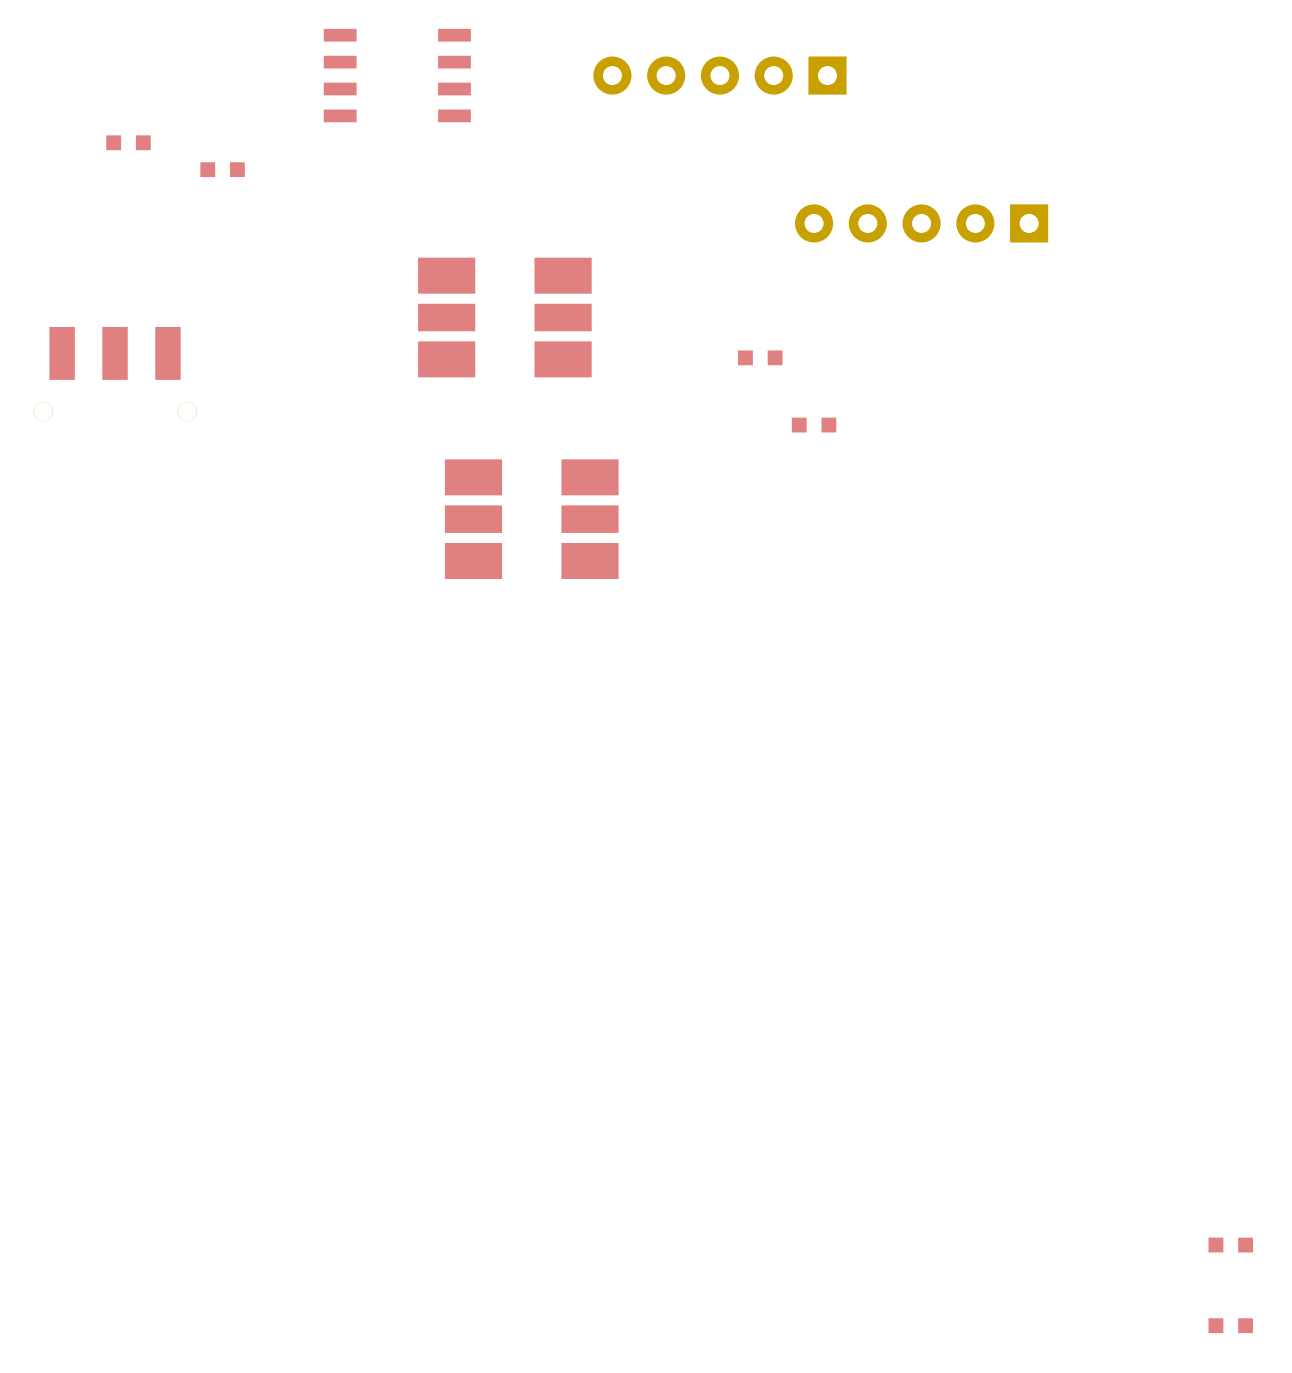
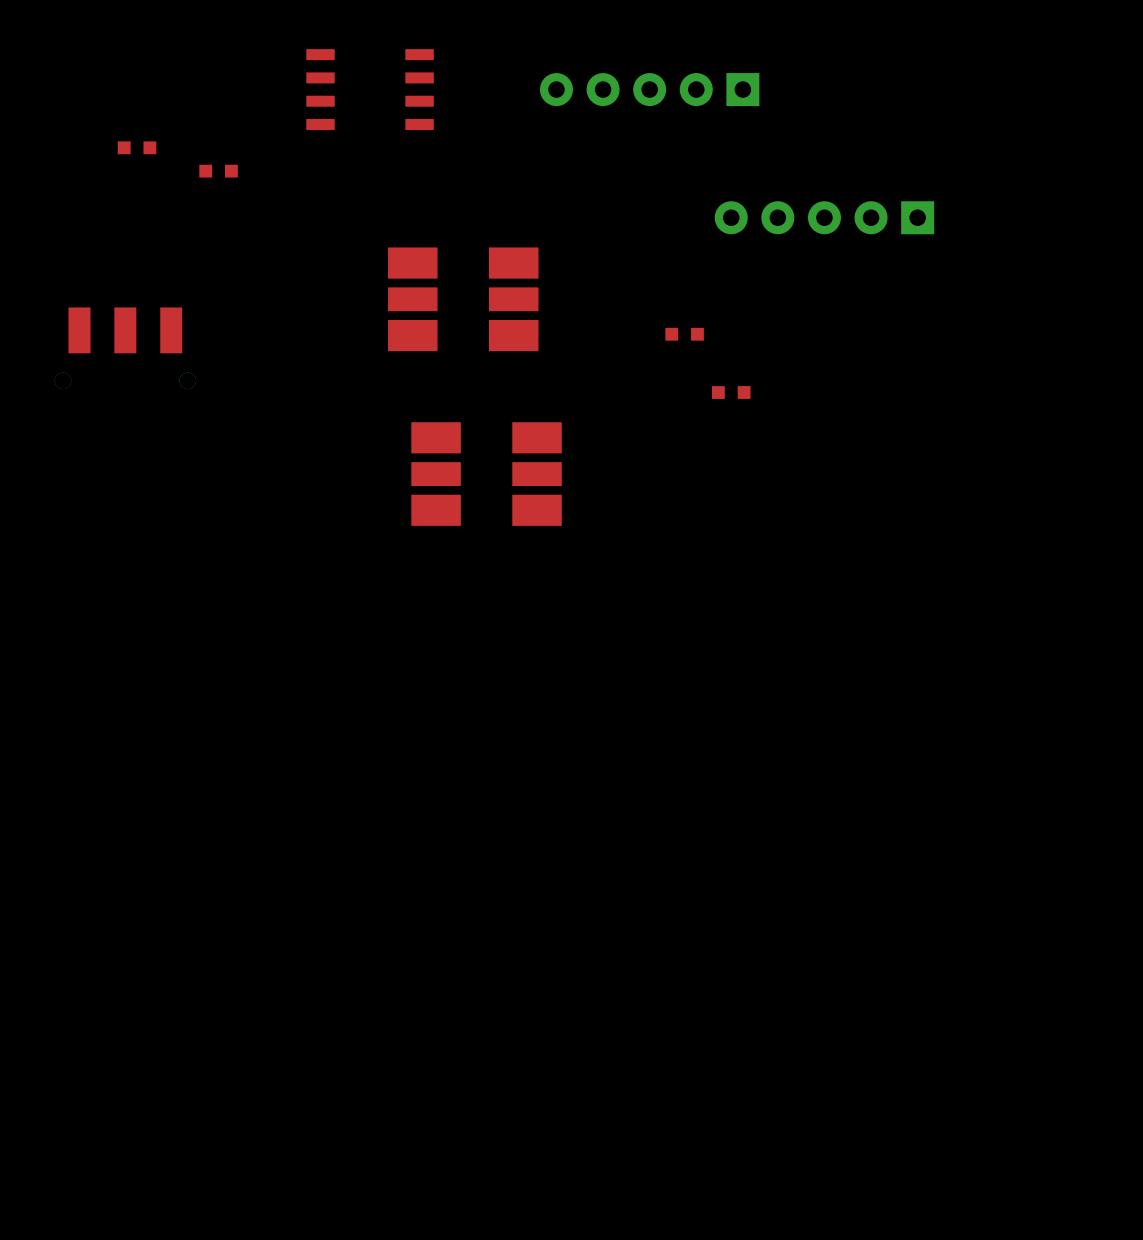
part: (1230, 1245) -> none
part: (1230, 1325) -> none

